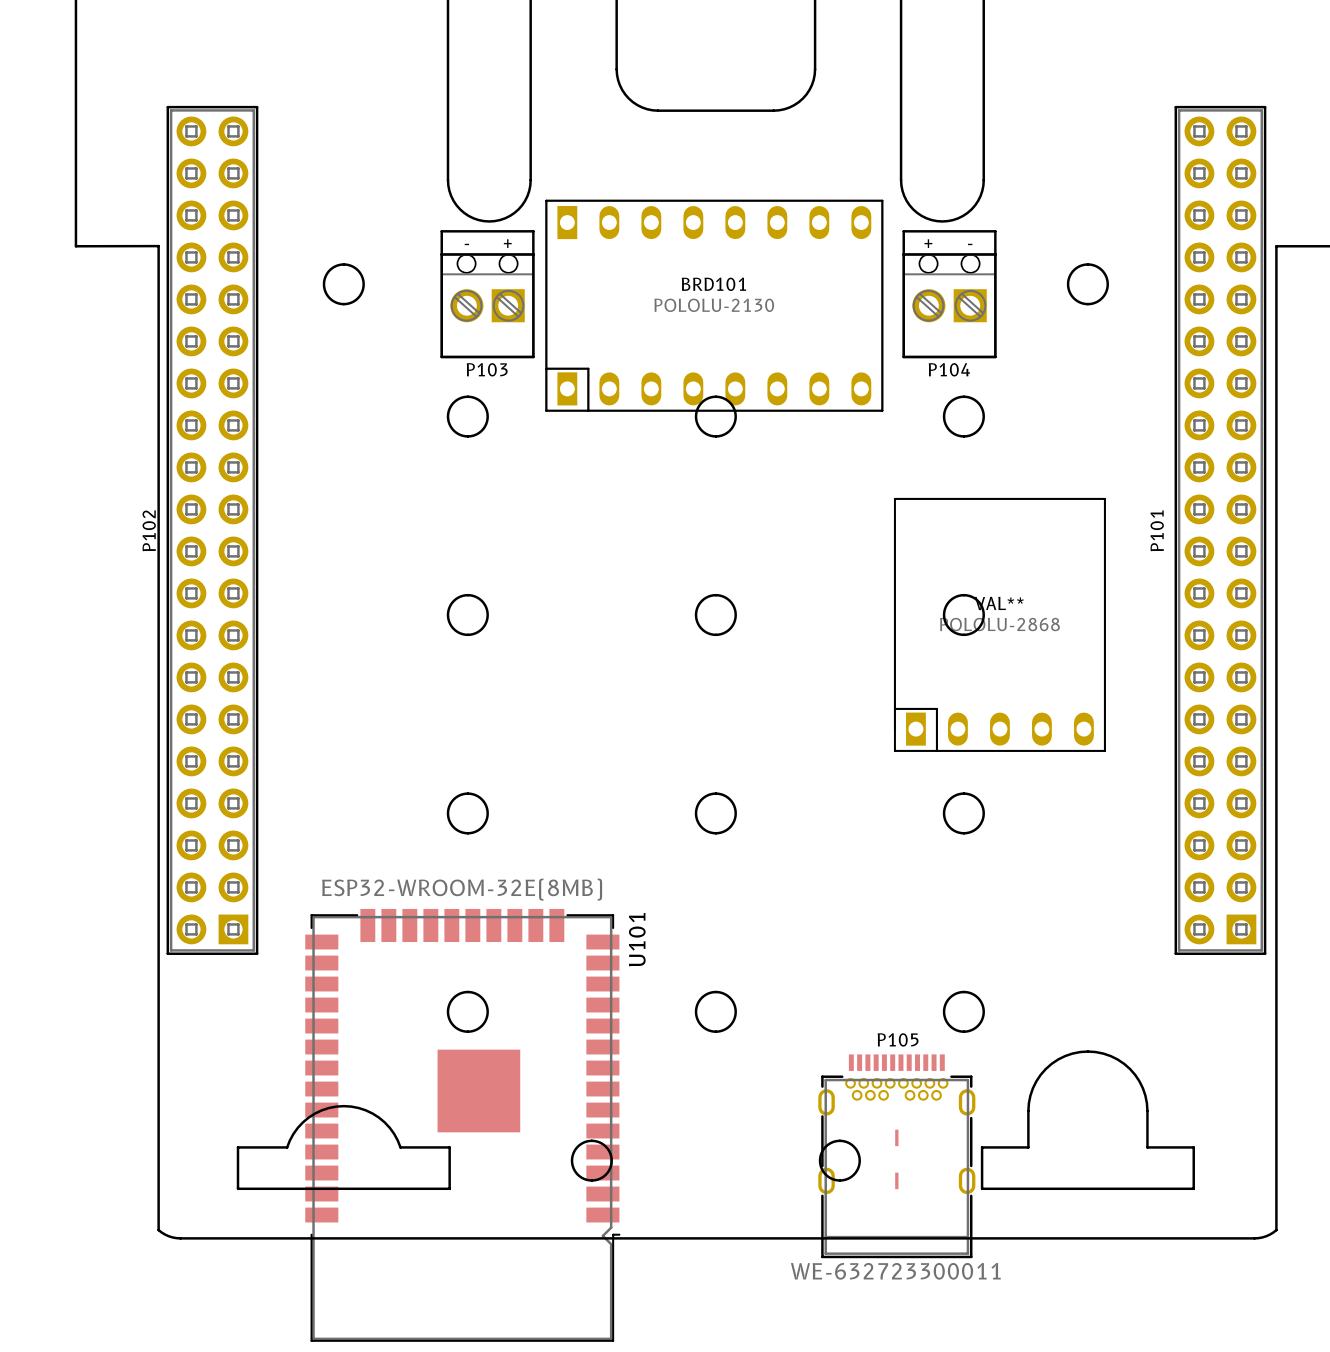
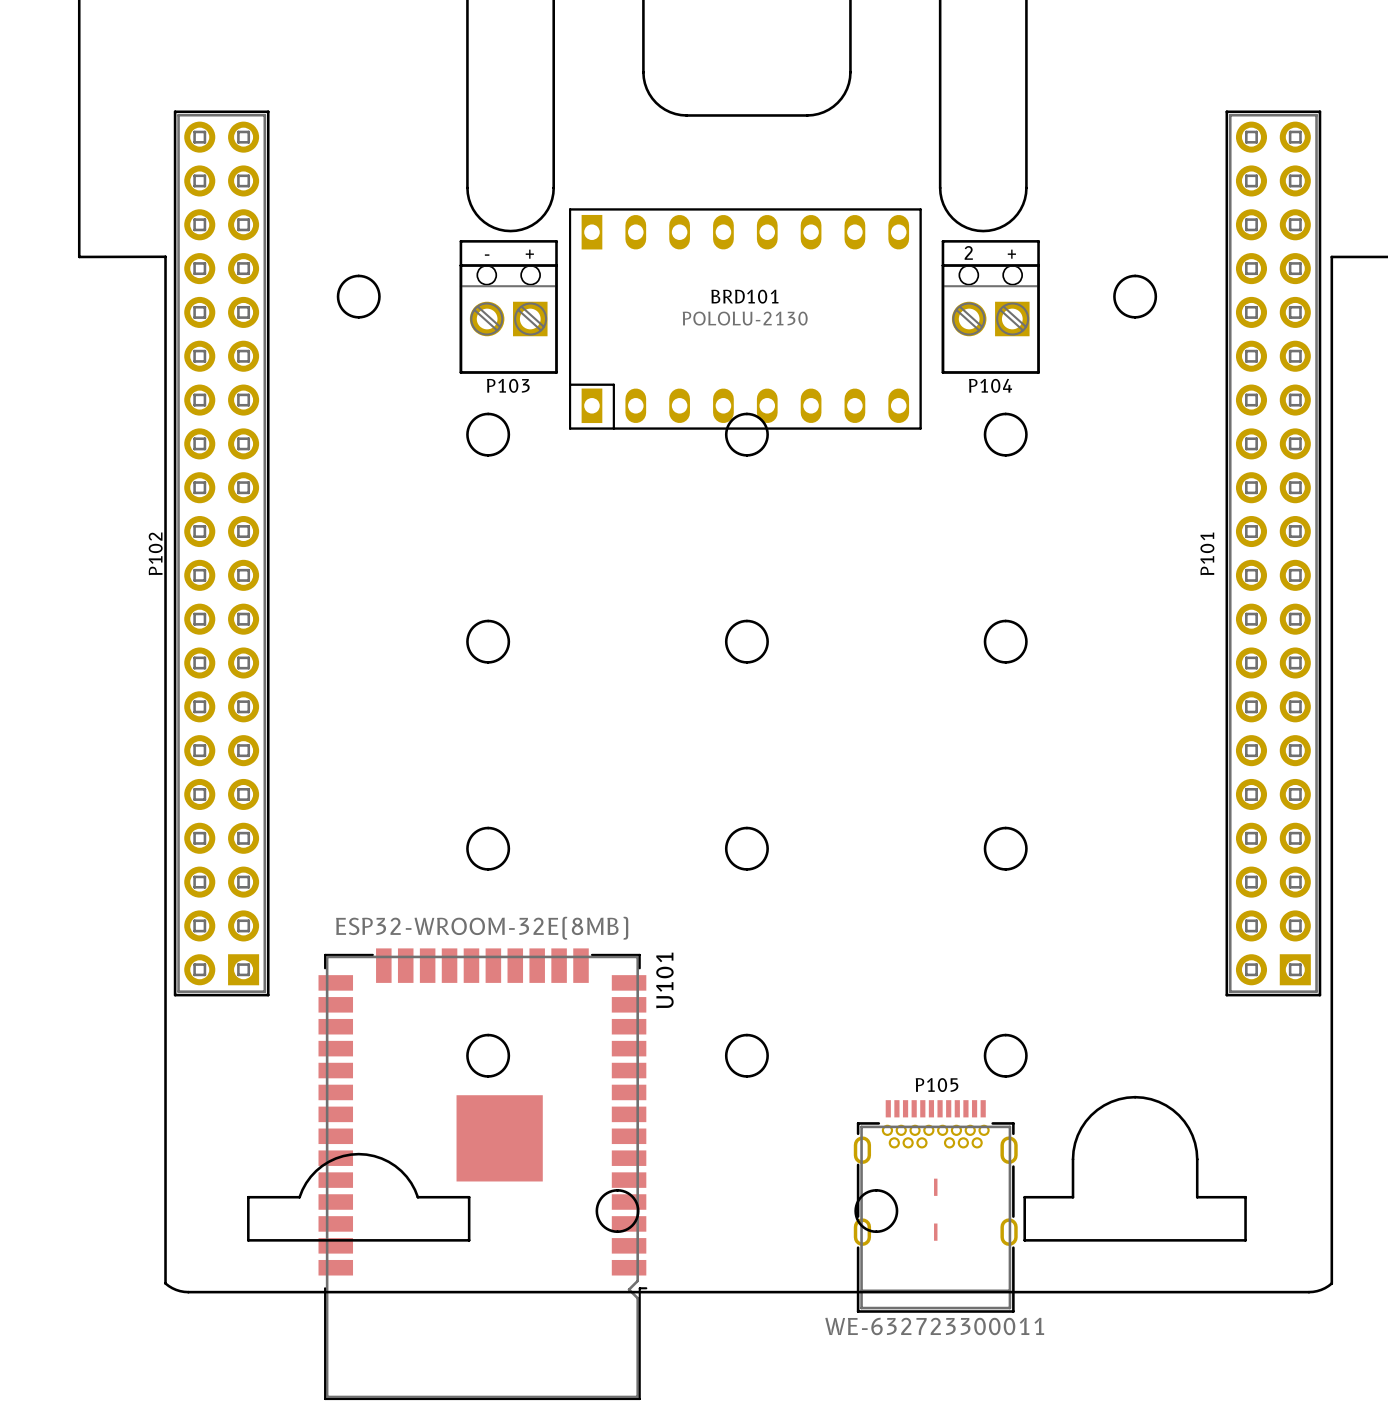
P104 text: + (928, 243) -> 2 (968, 252)
P104 text: - (970, 244) -> + (1011, 254)
VAL**: POLOLU-2868 (999, 624) -> none

